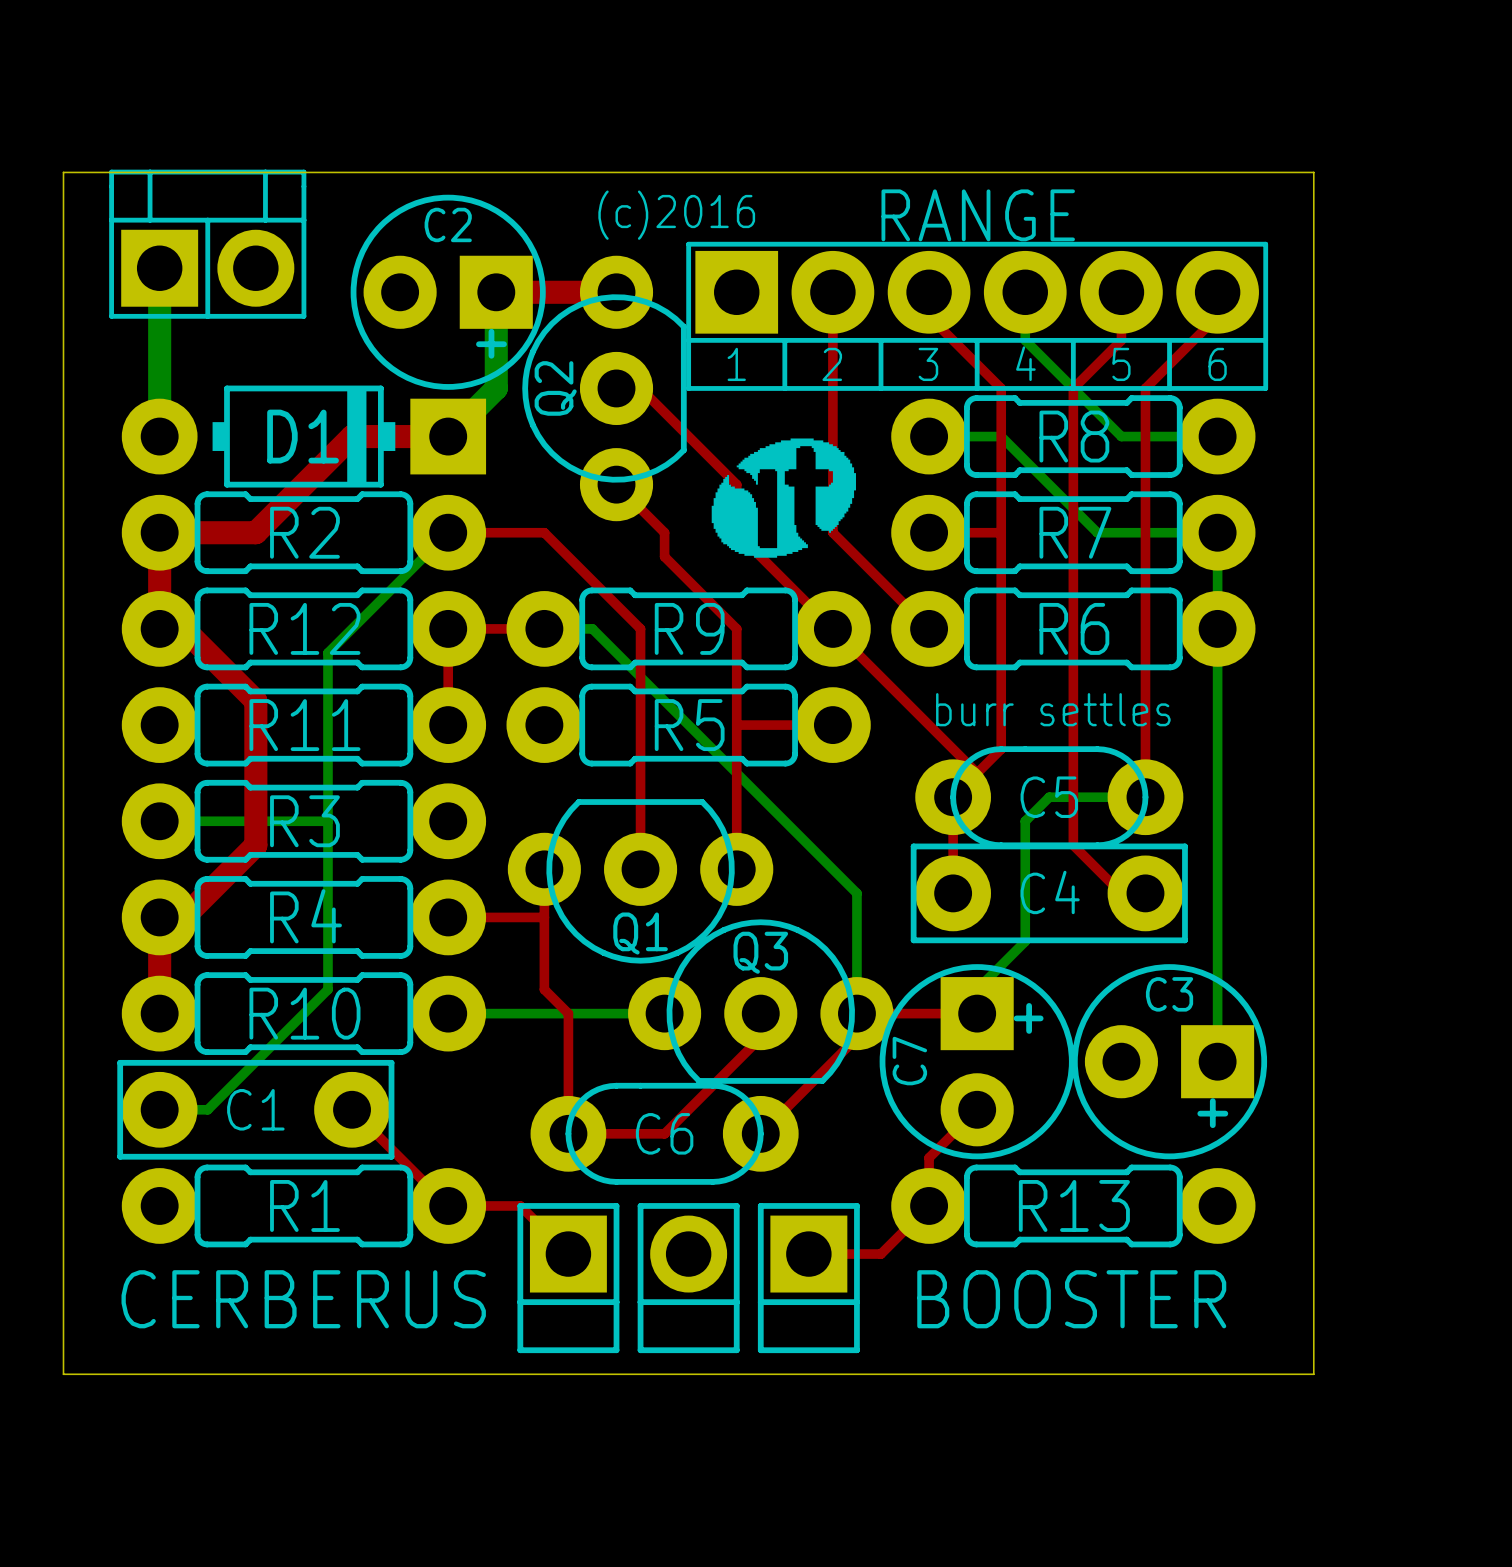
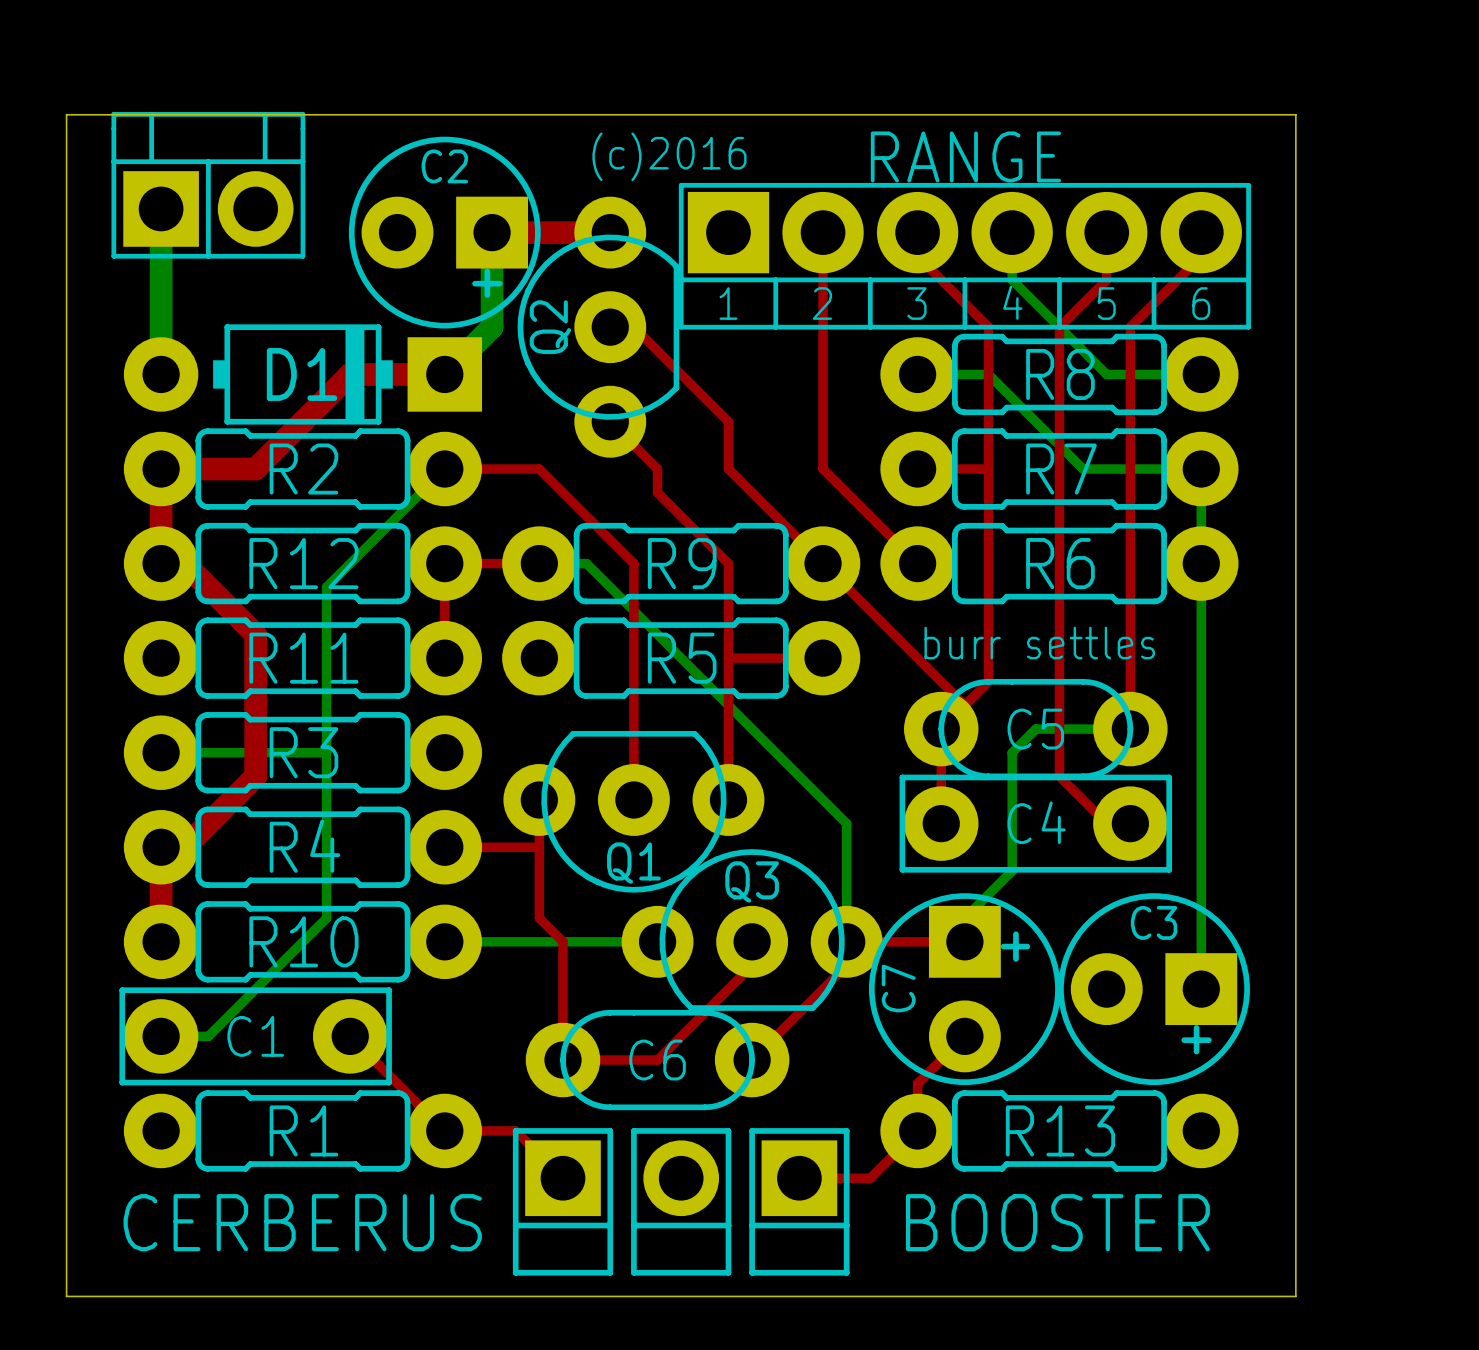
drawing: [711, 438, 856, 558] -> none

